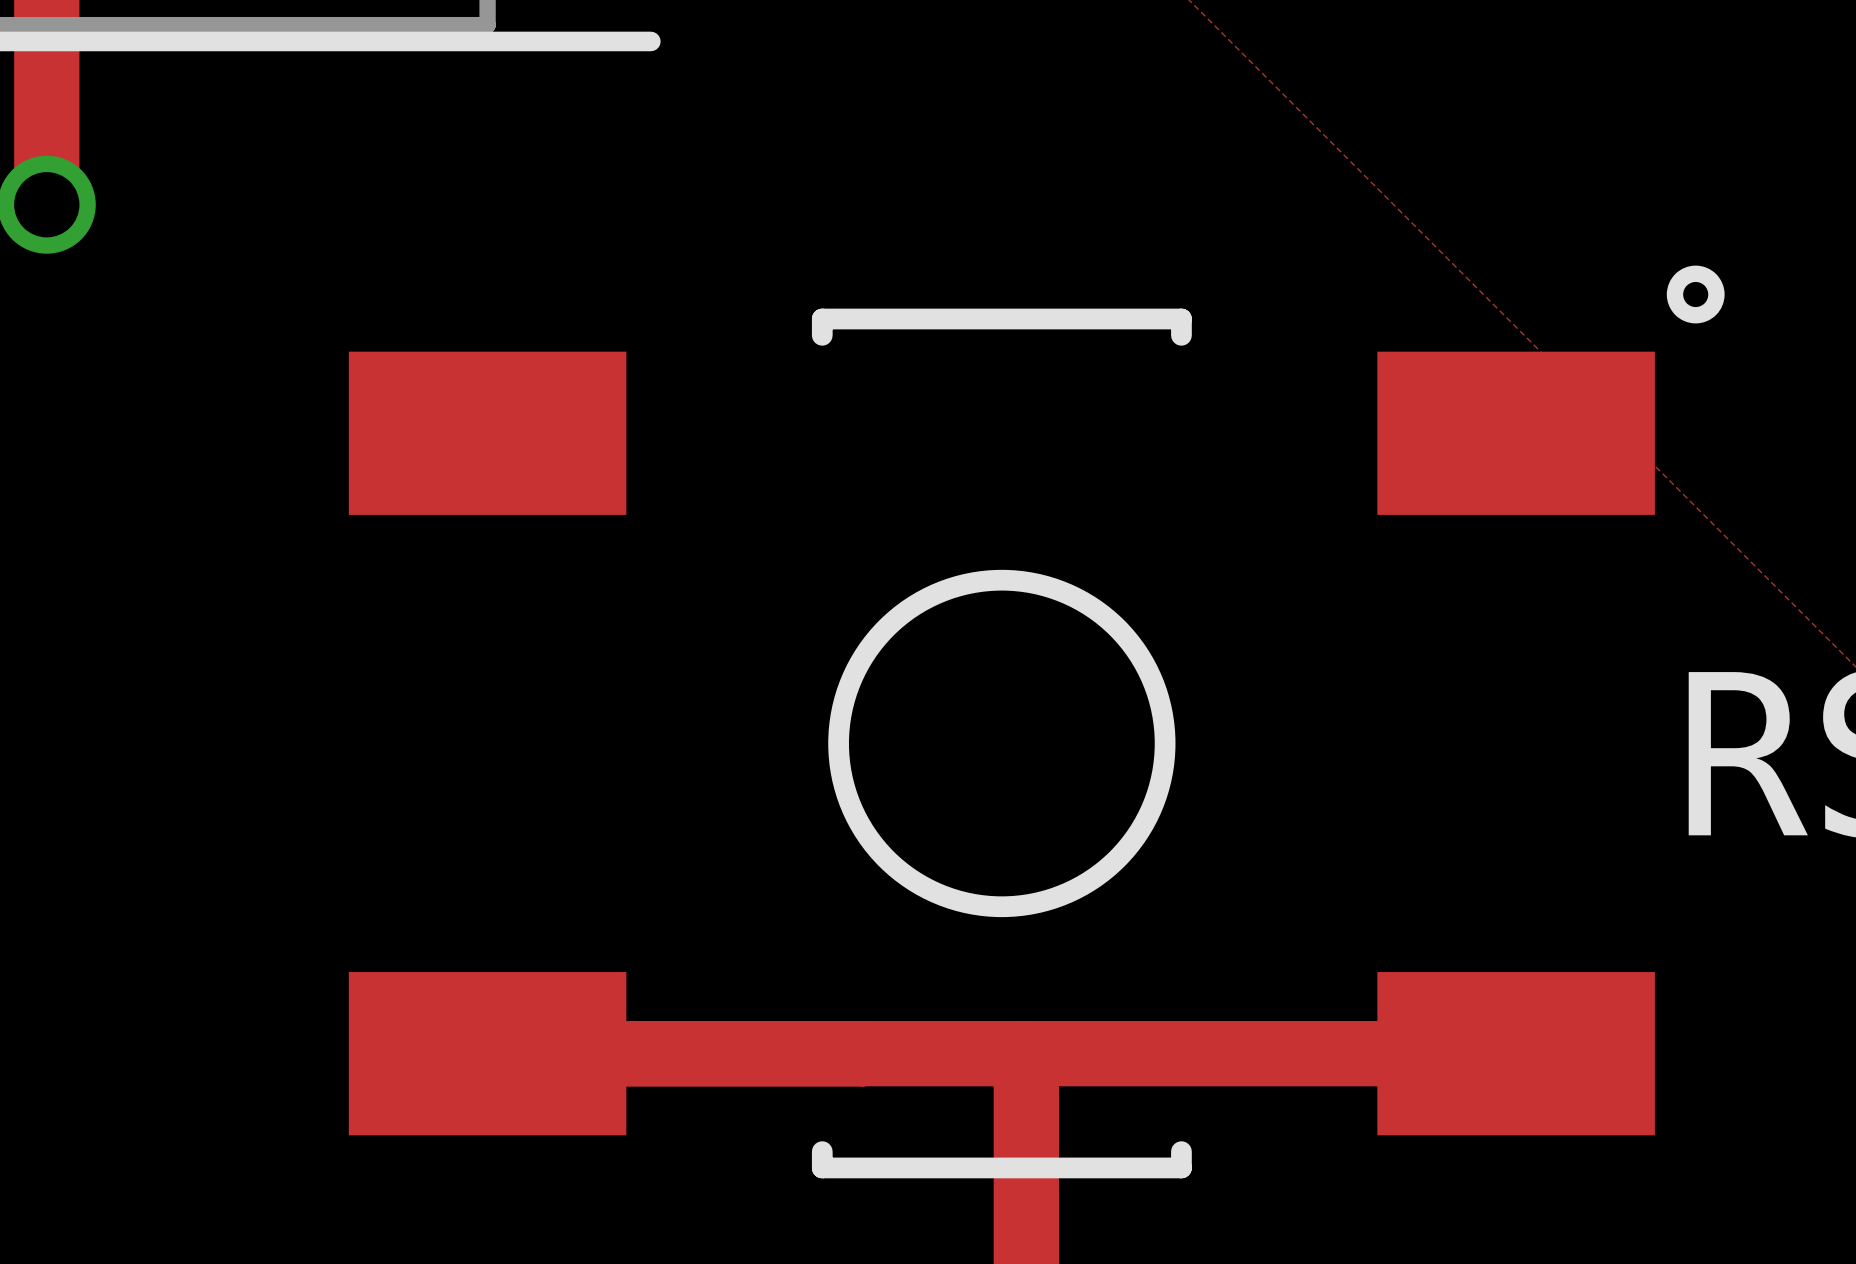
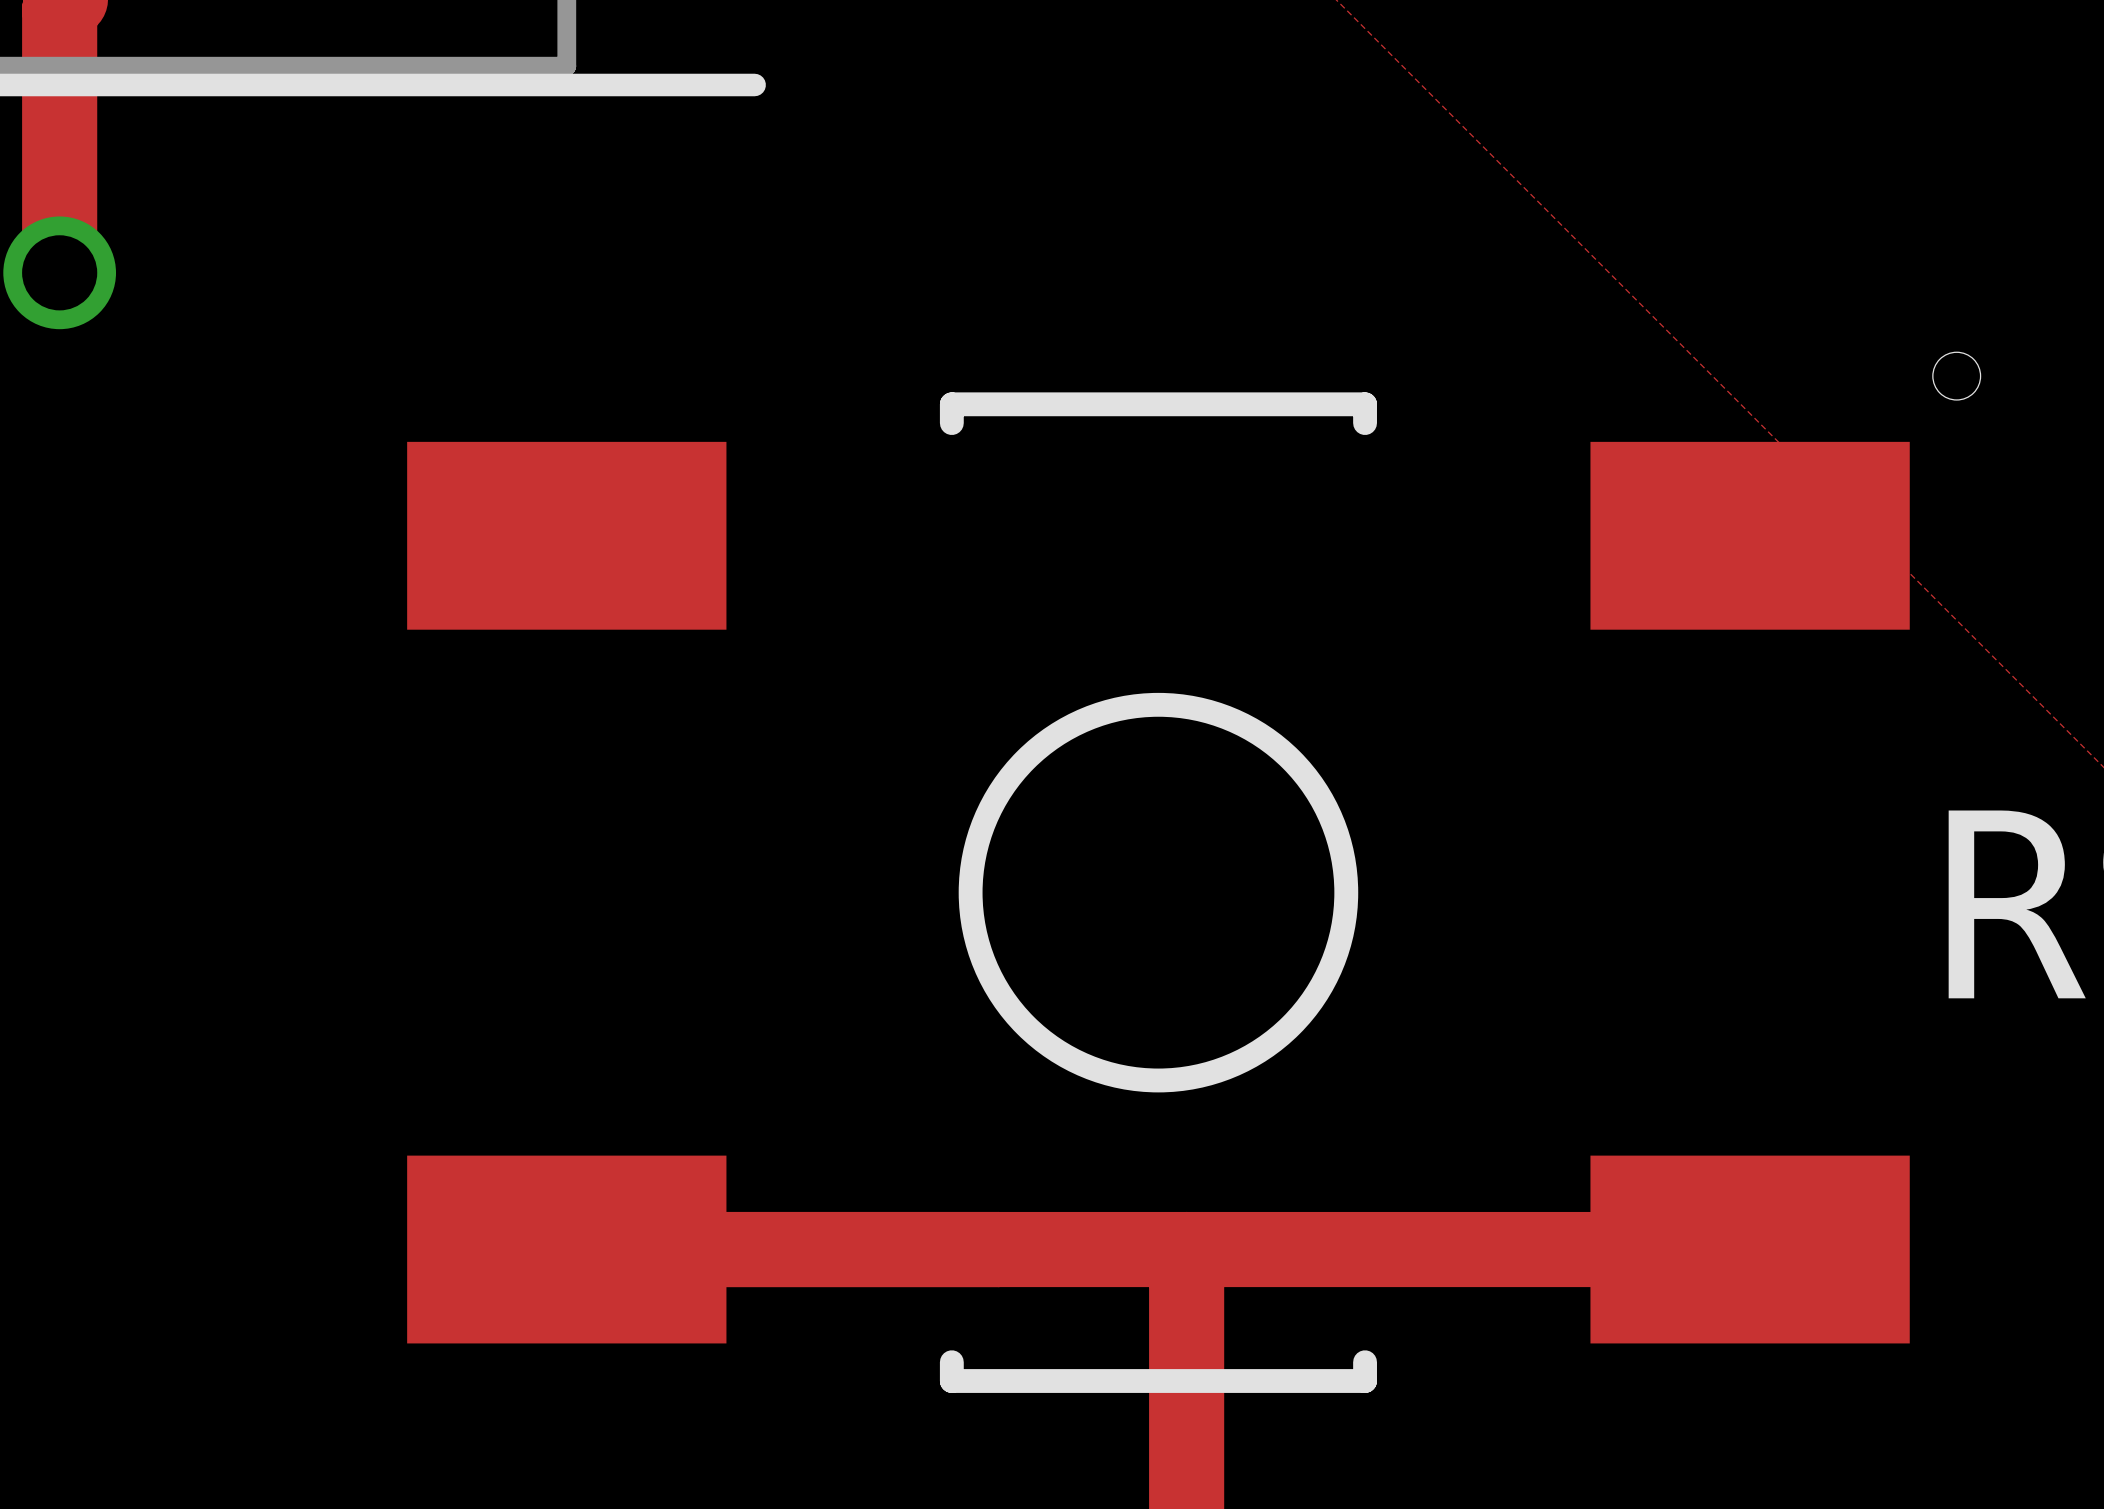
part footprint: [348, 265, 1725, 1179] -> [407, 352, 1981, 1393]

